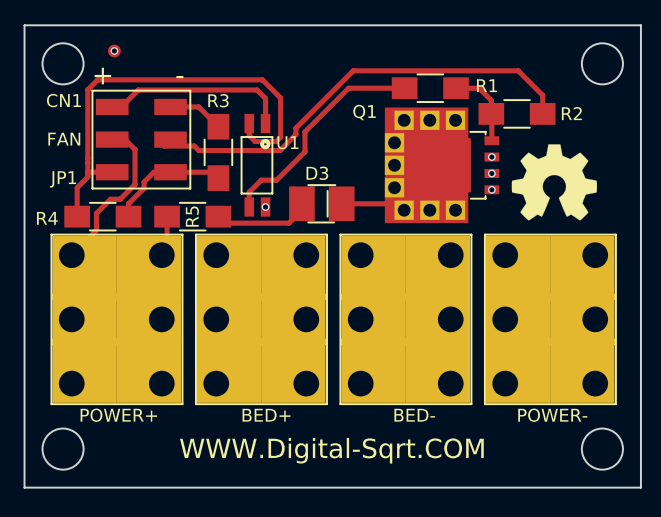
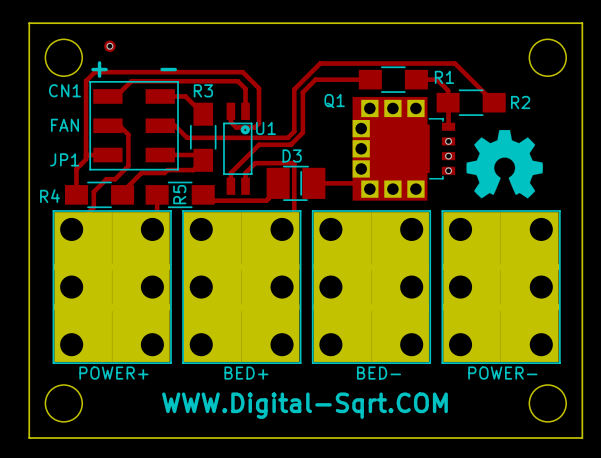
track: (348, 88) (304, 131) (304, 151) (276, 180) (261, 180) -> (320, 79) (315, 79) (302, 92) (302, 132) (290, 144) (259, 144) (241, 162)
track: (542, 113) (542, 95) (518, 70) (353, 70) (295, 128) (295, 134) (279, 150) (198, 150) (194, 146) (164, 146) (157, 139) -> (494, 102) (455, 63) (320, 63) (294, 89) (294, 131) (287, 137) (187, 137) (175, 125) (167, 125)
track: (157, 174) (157, 172) (153, 172) (144, 182) (144, 188) (128, 203) (128, 213) -> (203, 160) (193, 170) (141, 172) (122, 192)
track: none -> (245, 186) (245, 172) (255, 163) (293, 163) (294, 217)
via: (265, 207) -> none

